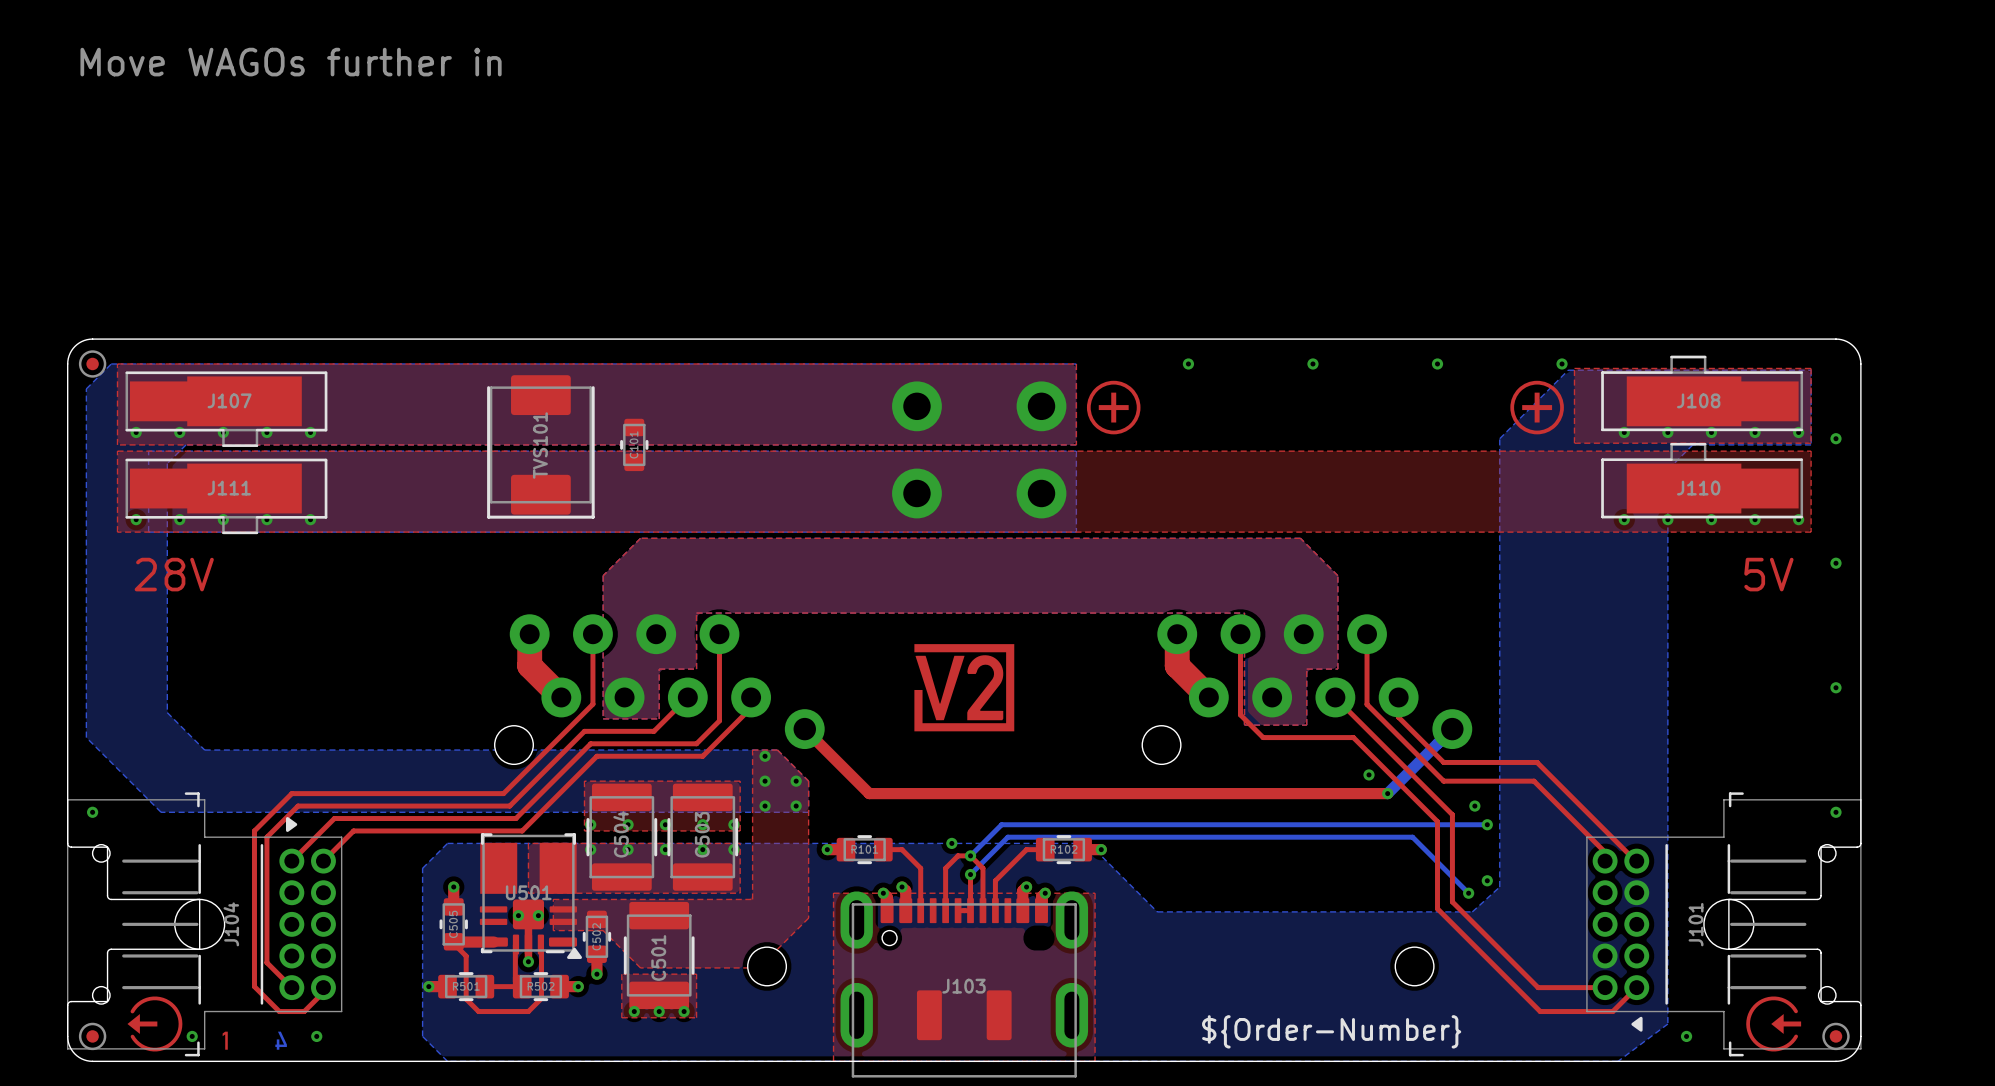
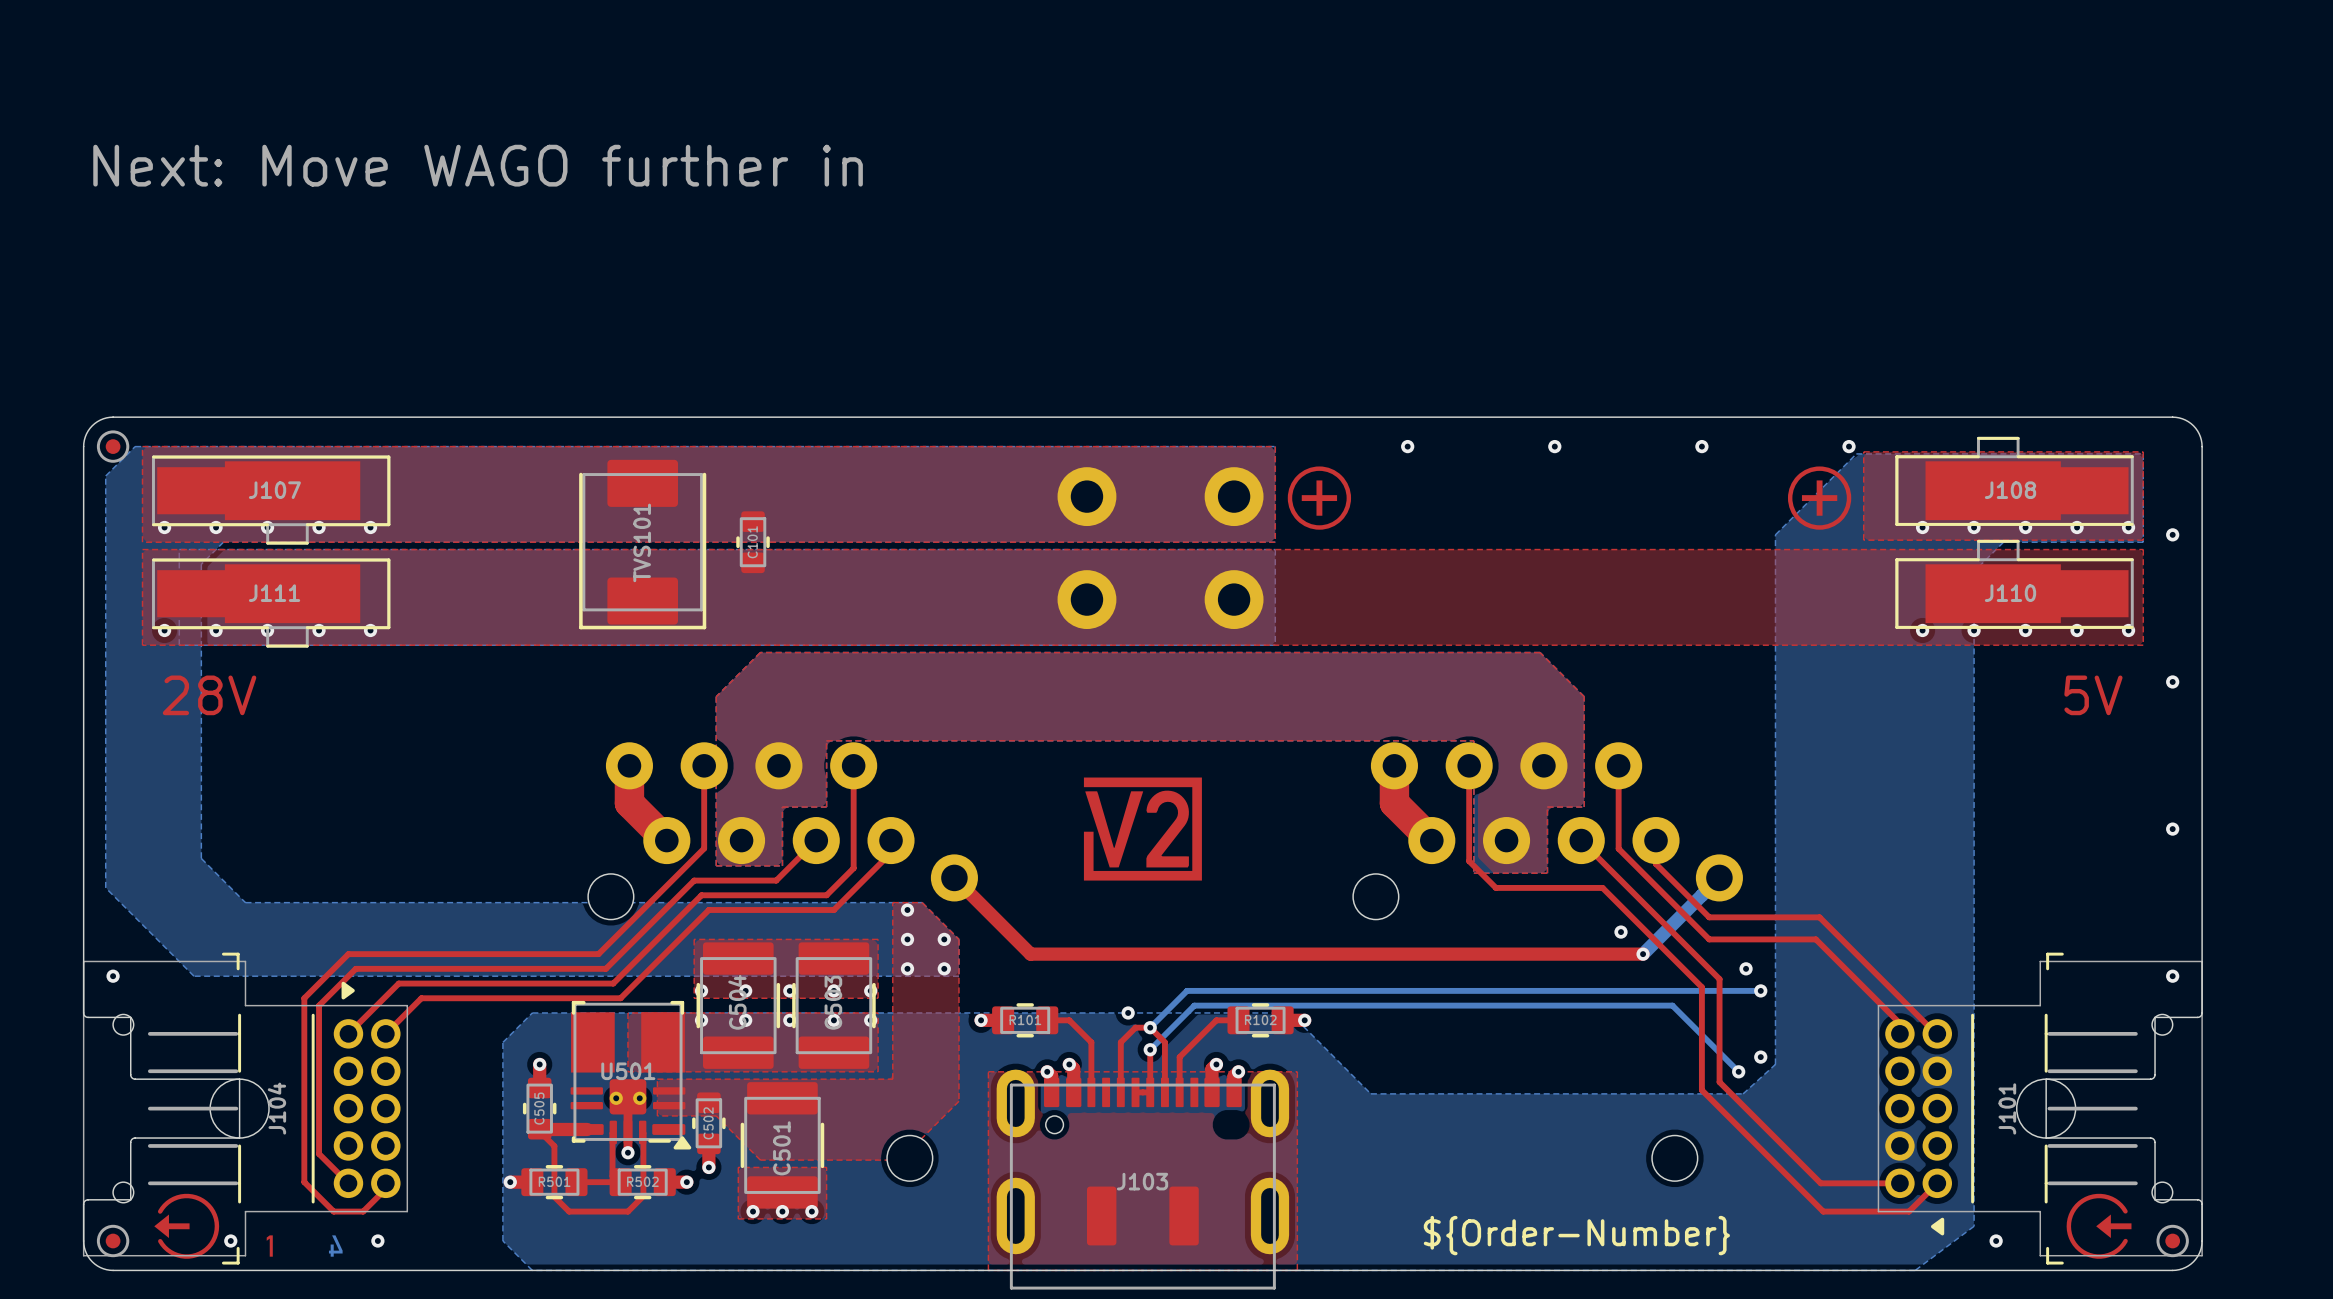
text: Move WAGOs further in (291, 62) -> none
text: none -> Next: Move WAGO further in (478, 165)

